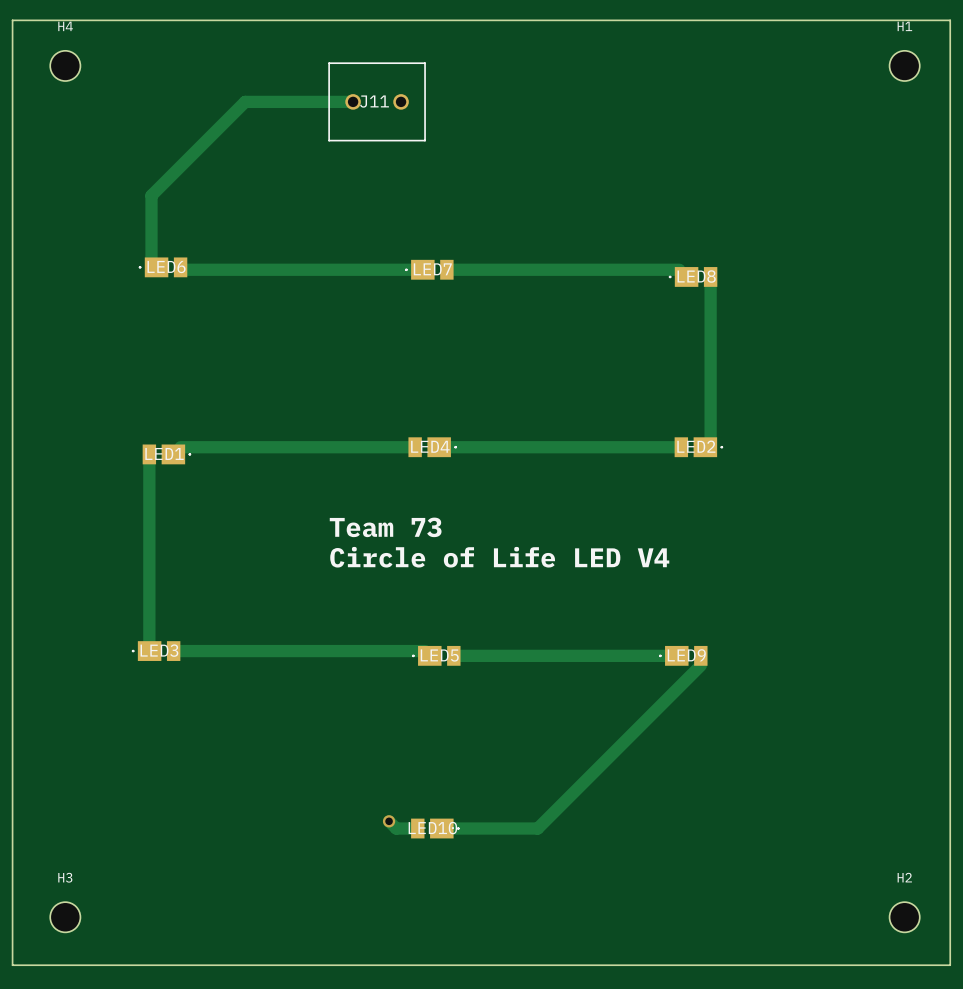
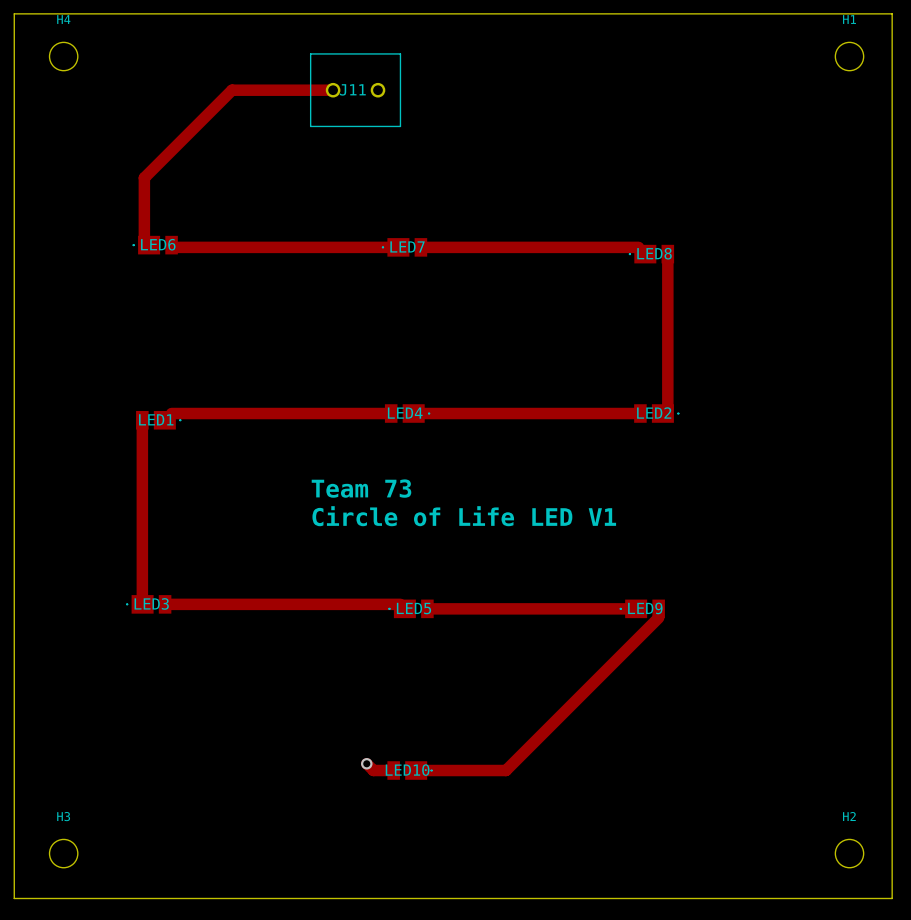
text: Circle of Life LED V4 (499, 557) -> Circle of Life LED V1 (464, 516)

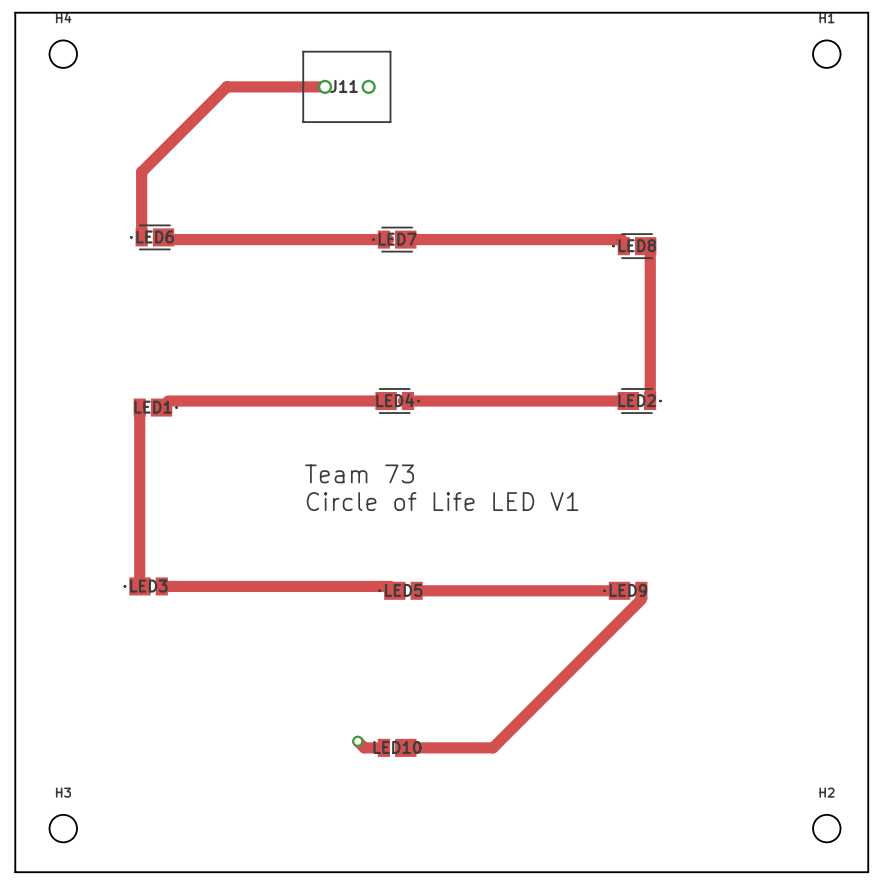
LED6 footprint: [132, 235, 178, 255] -> [130, 224, 175, 251]
LED7 footprint: [382, 238, 428, 257] -> [372, 226, 417, 253]
LED8 footprint: [629, 244, 675, 264] -> [612, 233, 657, 260]
LED4 footprint: [384, 404, 431, 423] -> [375, 388, 420, 414]
LED2 footprint: [634, 404, 680, 423] -> [617, 388, 662, 414]

